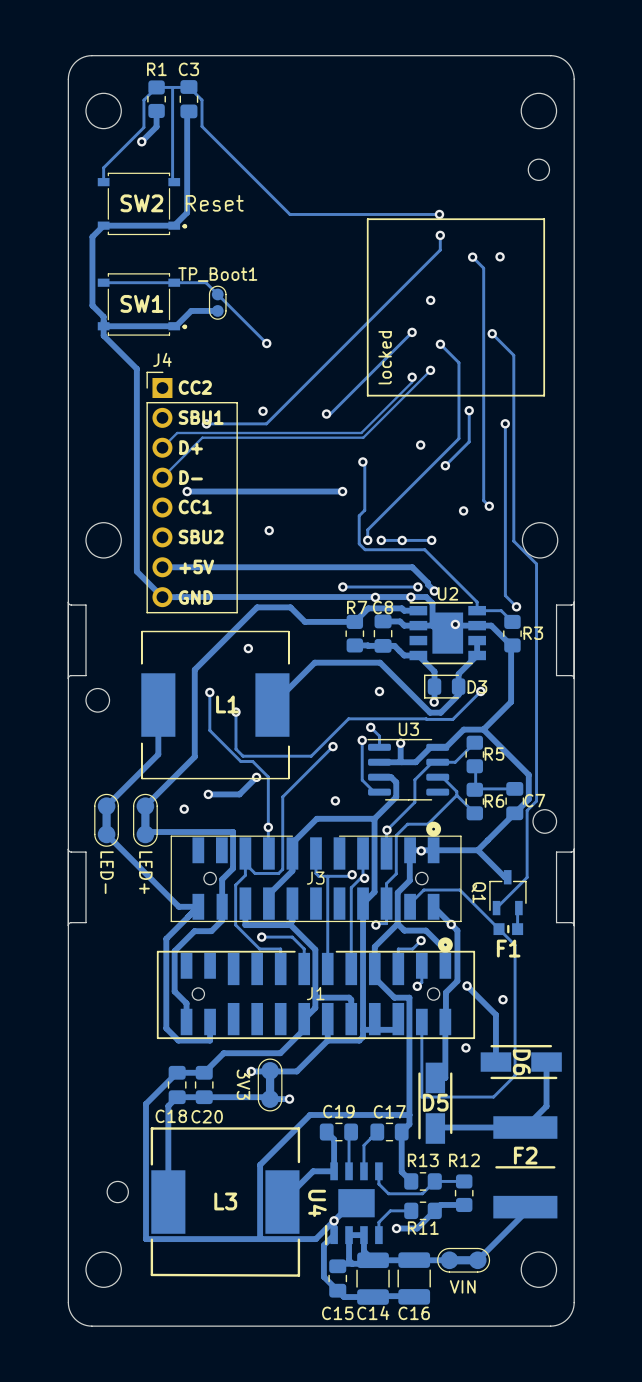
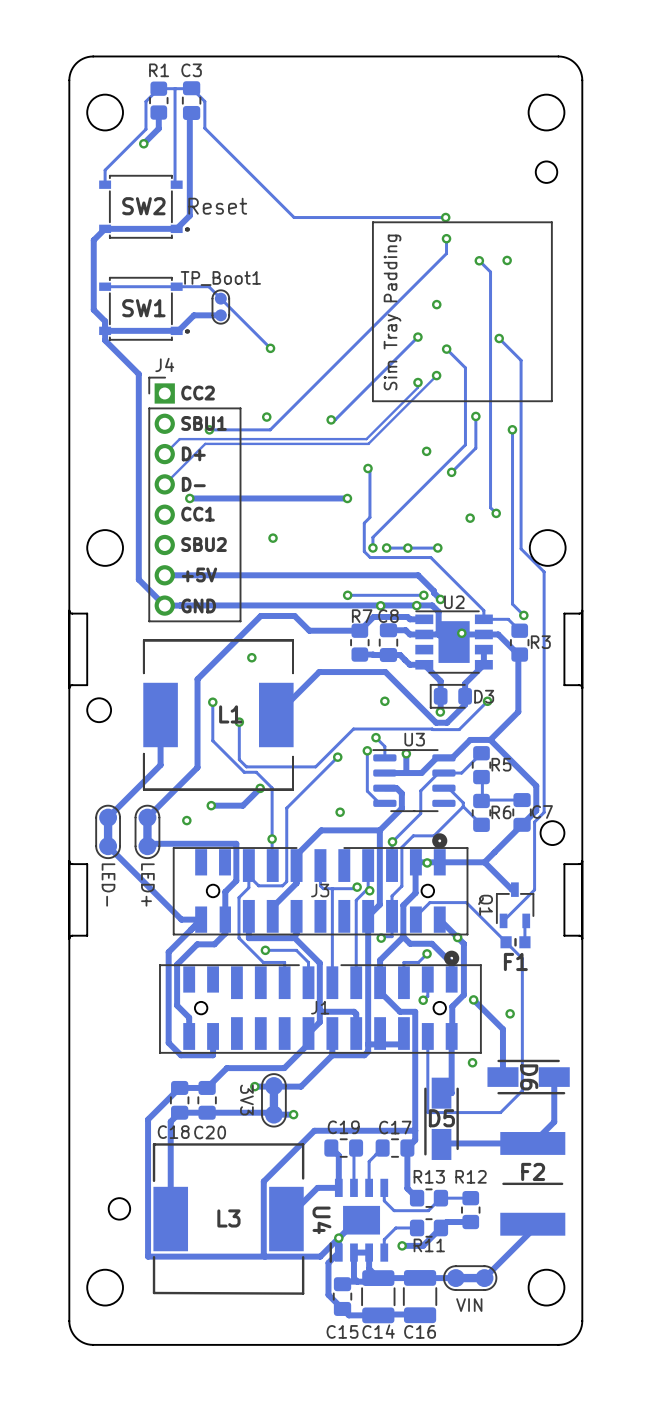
text: locked (385, 357) -> Sim Tray Padding (392, 312)

